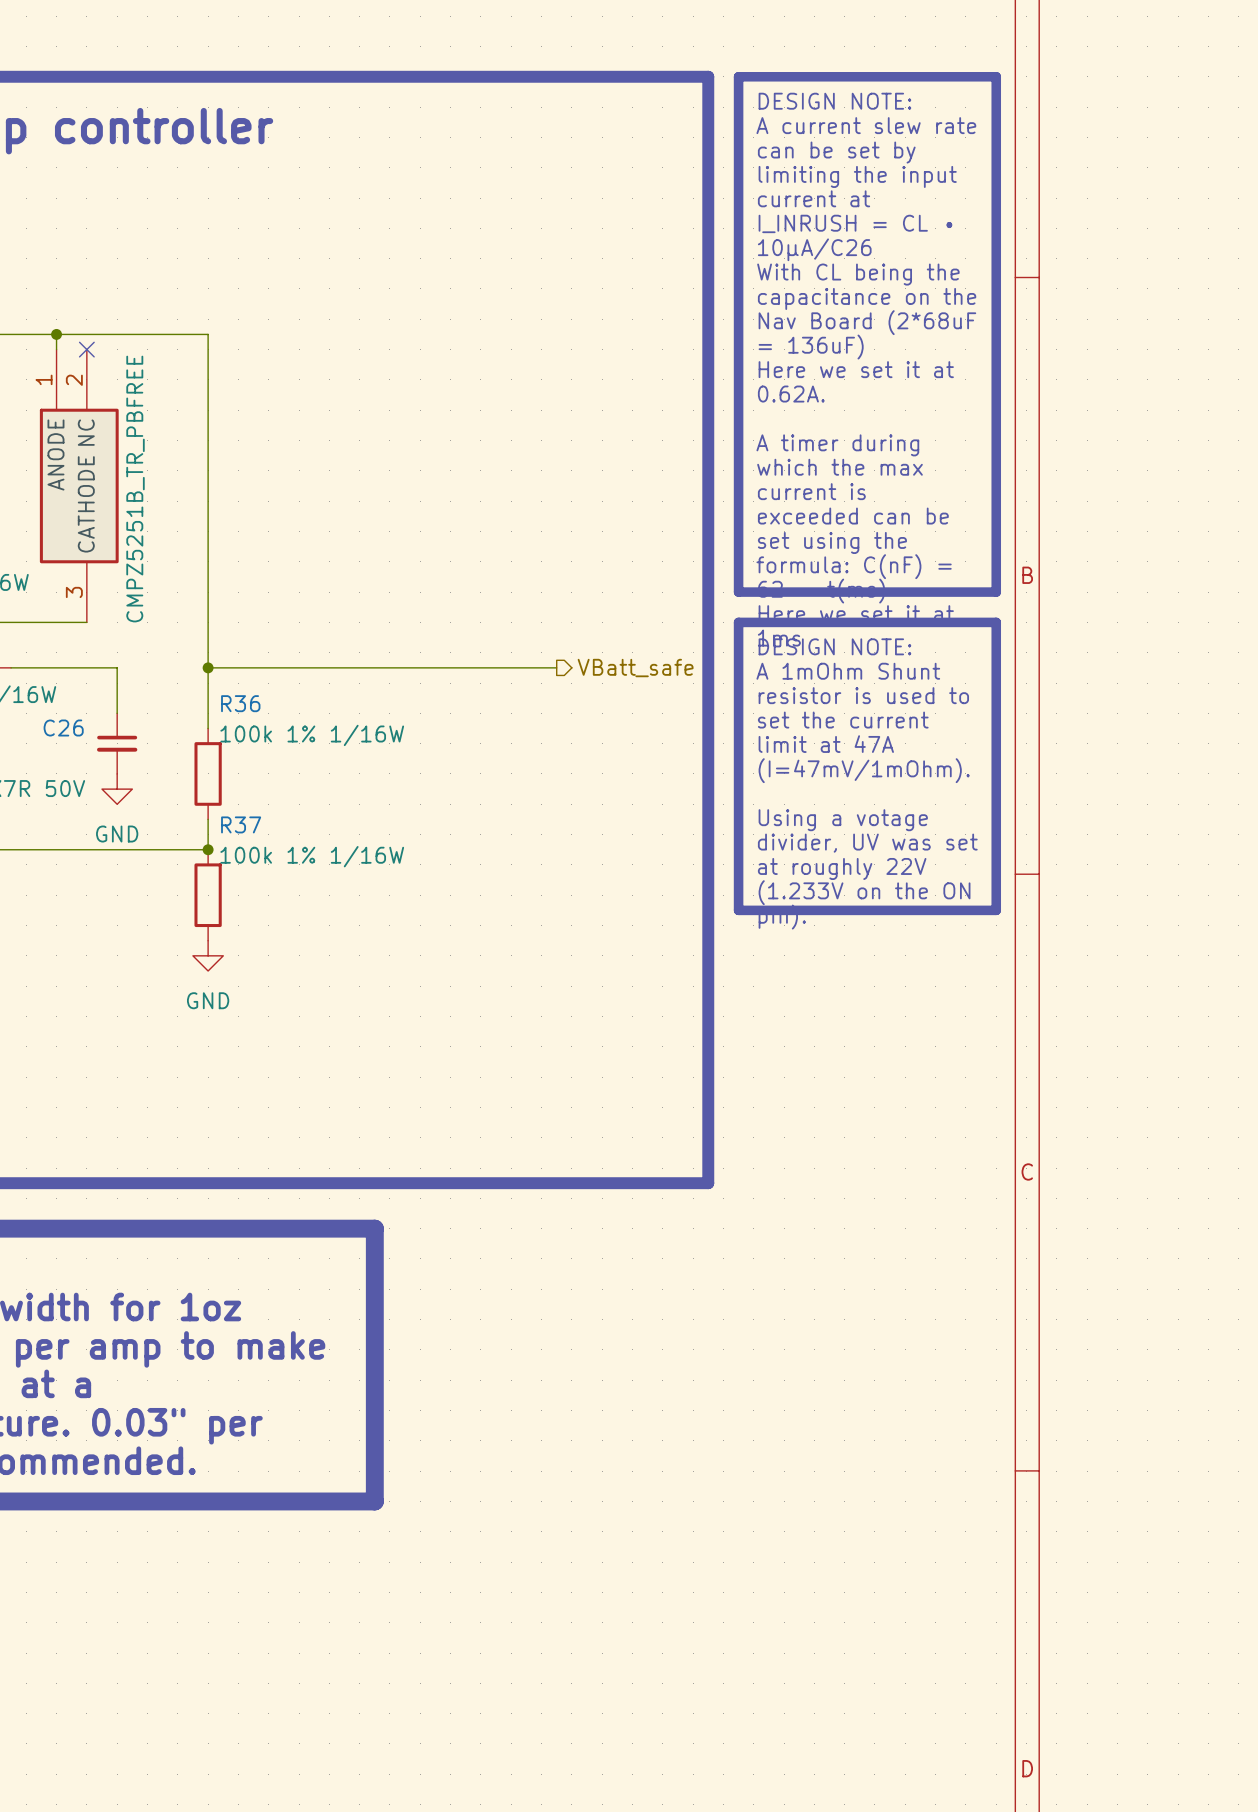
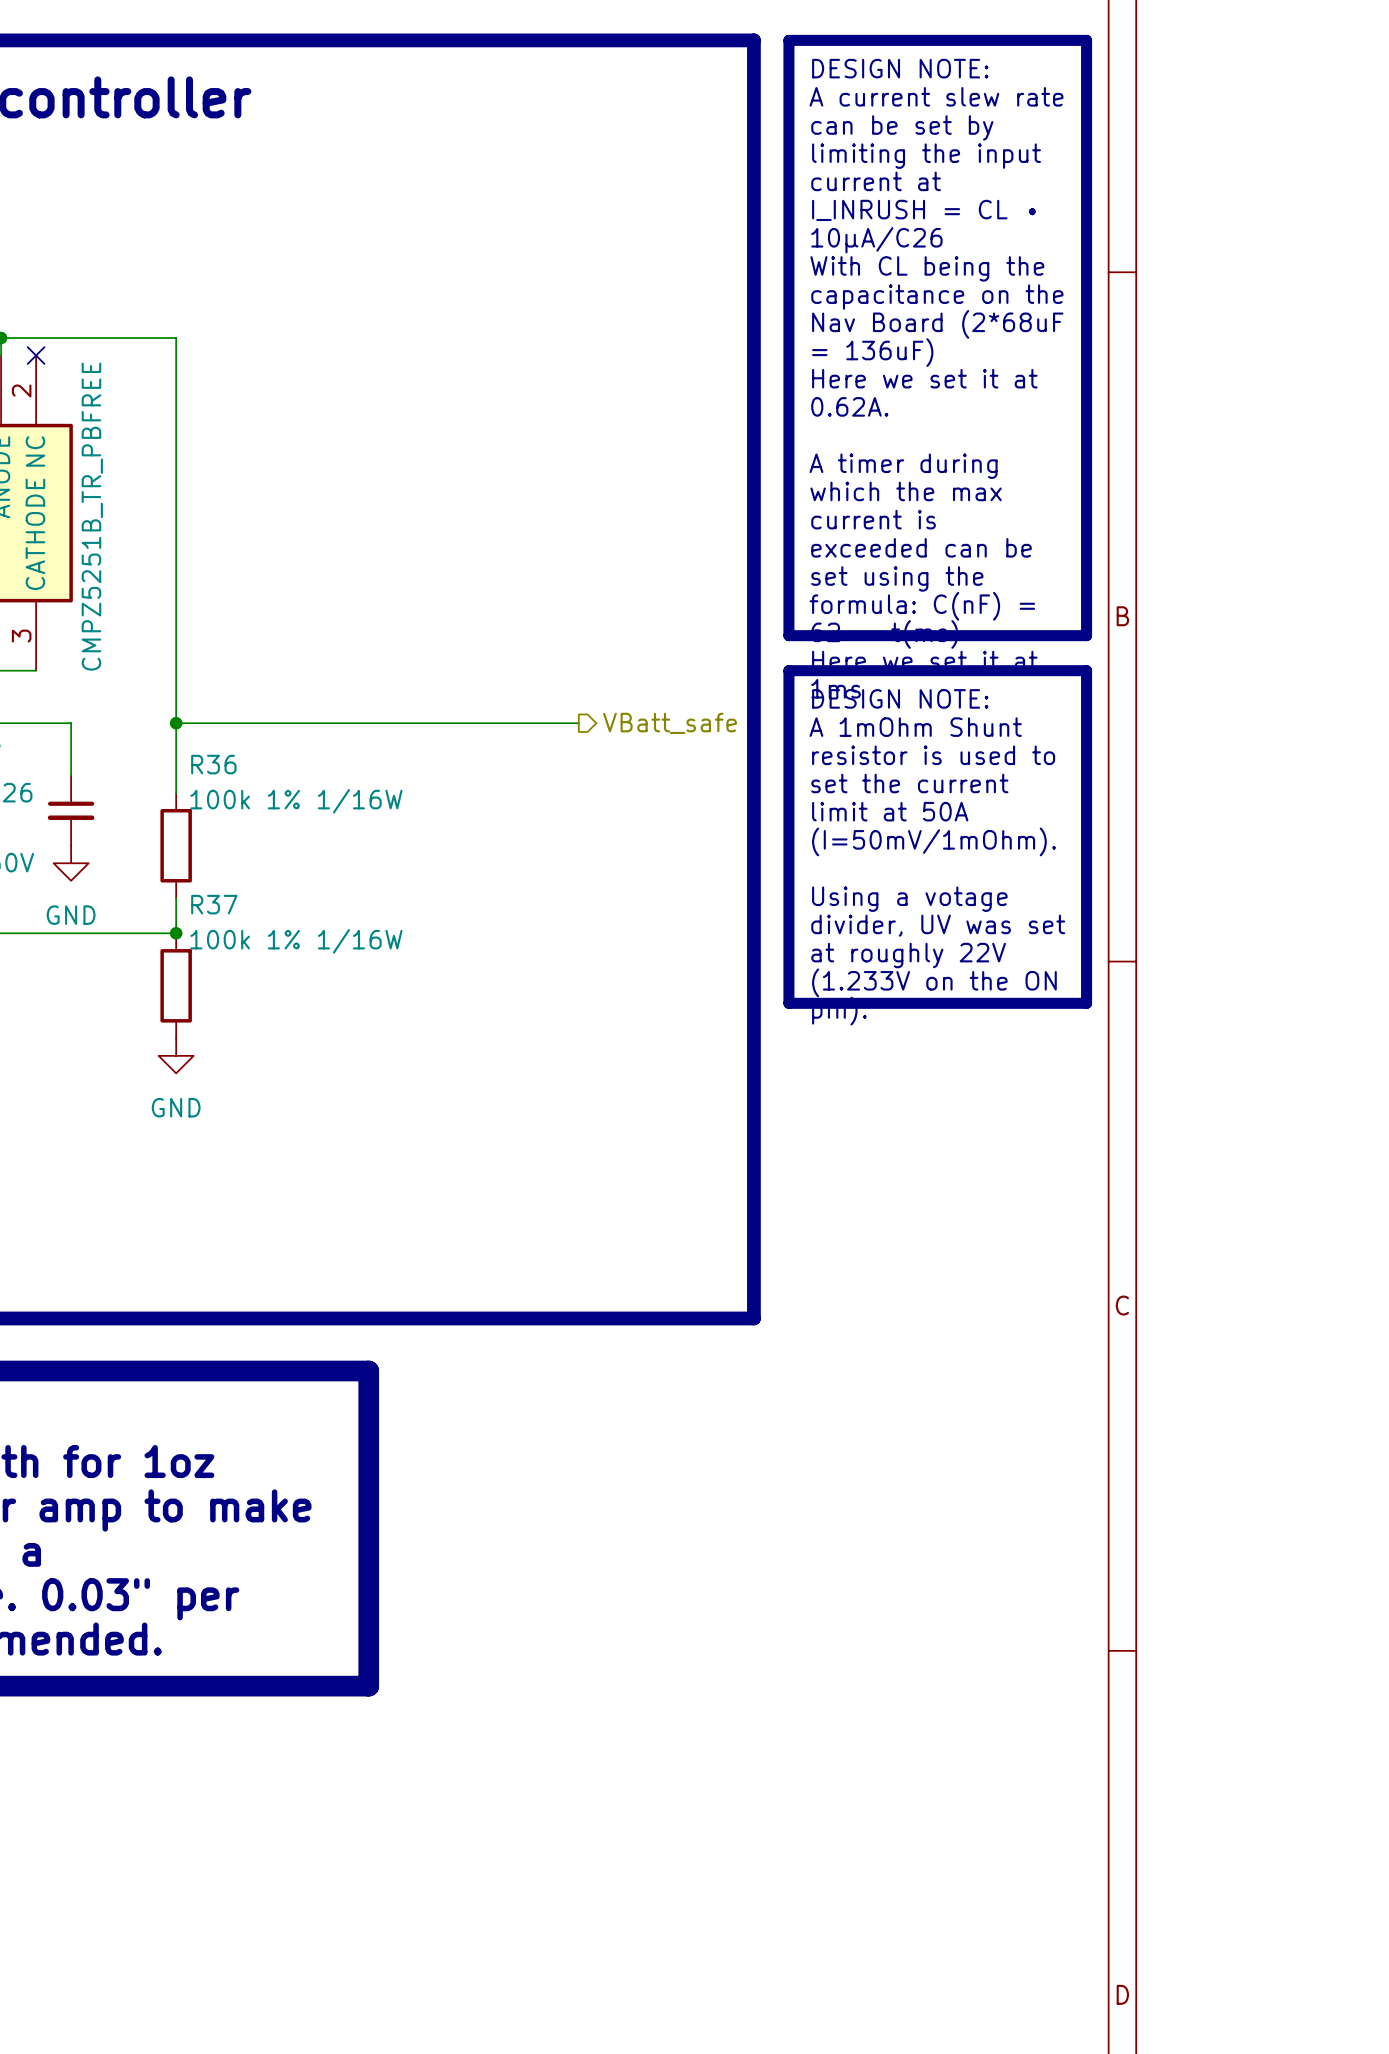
text: limit at 47A (826, 744) -> limit at 50A (890, 811)
text: (I=47mV/1mOhm). (864, 770) -> (I=50mV/1mOhm). (934, 841)

